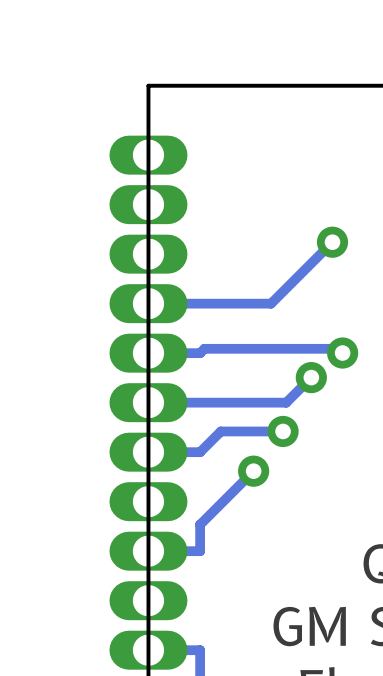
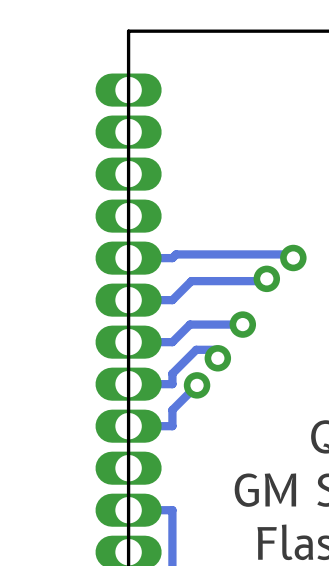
track: (332, 242) (271, 303) (148, 303) -> none
via: (332, 242) -> none
track: (311, 377) (286, 402) (200, 402) -> (272, 281) (191, 281) (172, 300)
track: none -> (218, 349) (196, 349) (172, 373) (172, 384) (128, 384)
track: (253, 471) (200, 524) (200, 532) -> (197, 385) (172, 410)
via: none -> (197, 385)

